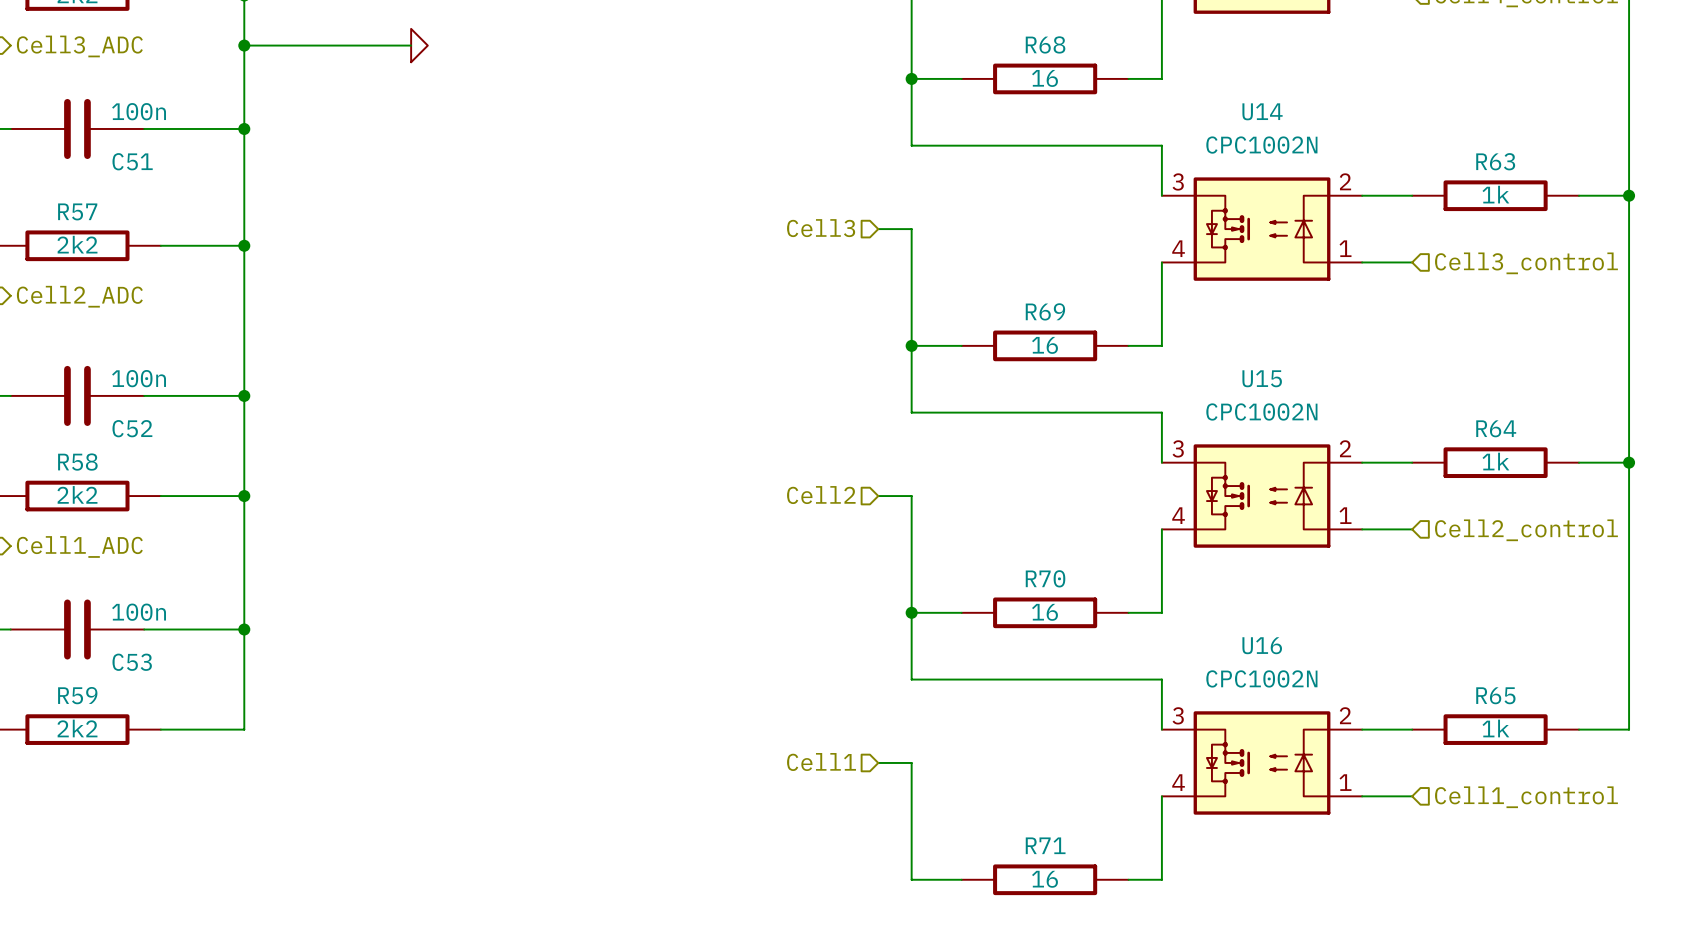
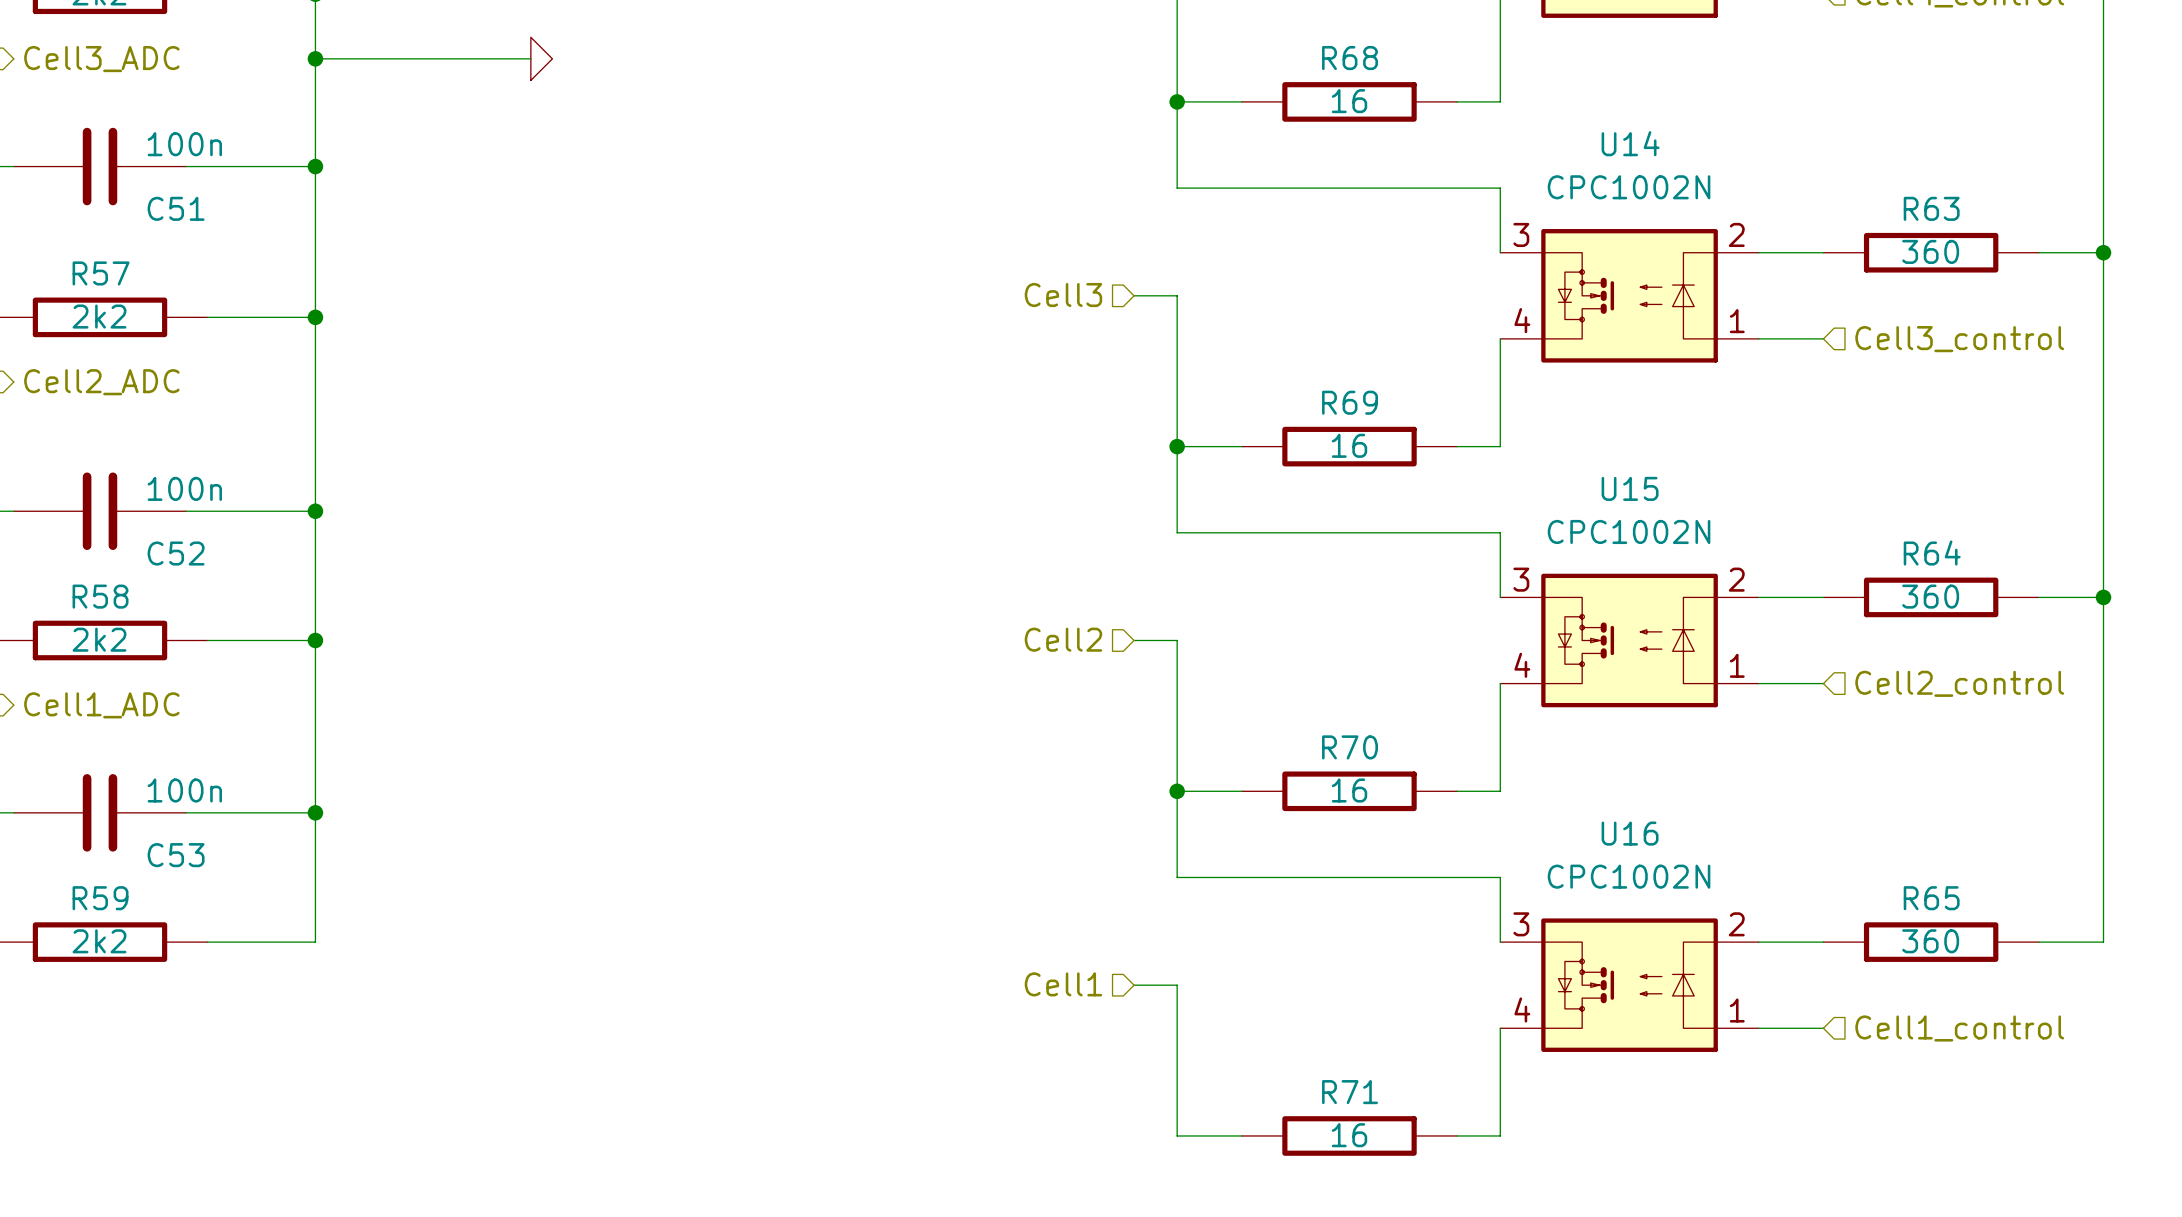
R63 value: 1k (1495, 194) -> 360 (1930, 251)
R64 value: 1k (1495, 461) -> 360 (1930, 596)
R65 value: 1k (1495, 728) -> 360 (1930, 941)

